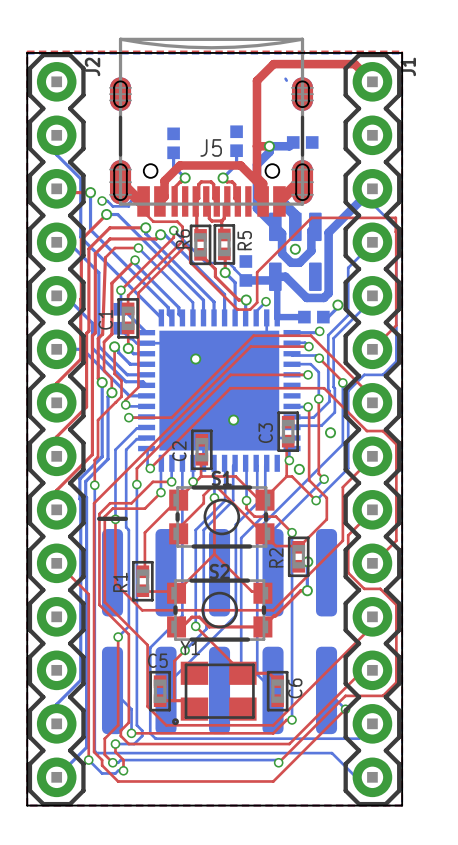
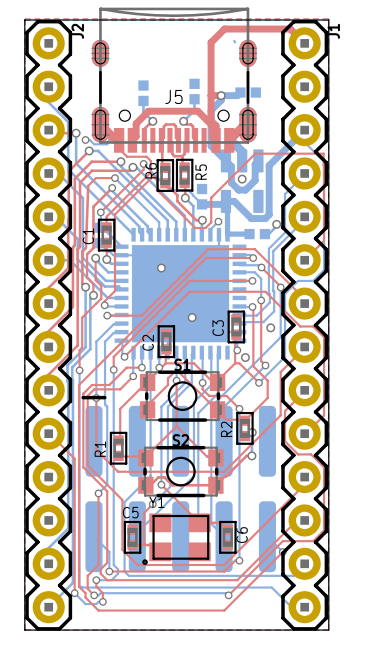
bottom track: (319, 331) (292, 332) -> none
via: (319, 331) -> none

